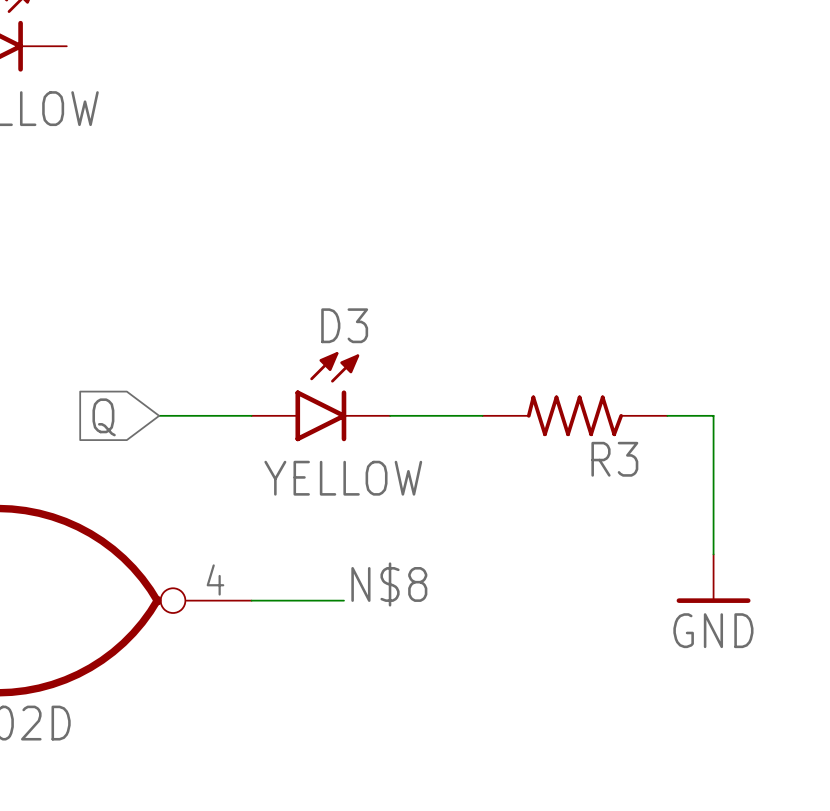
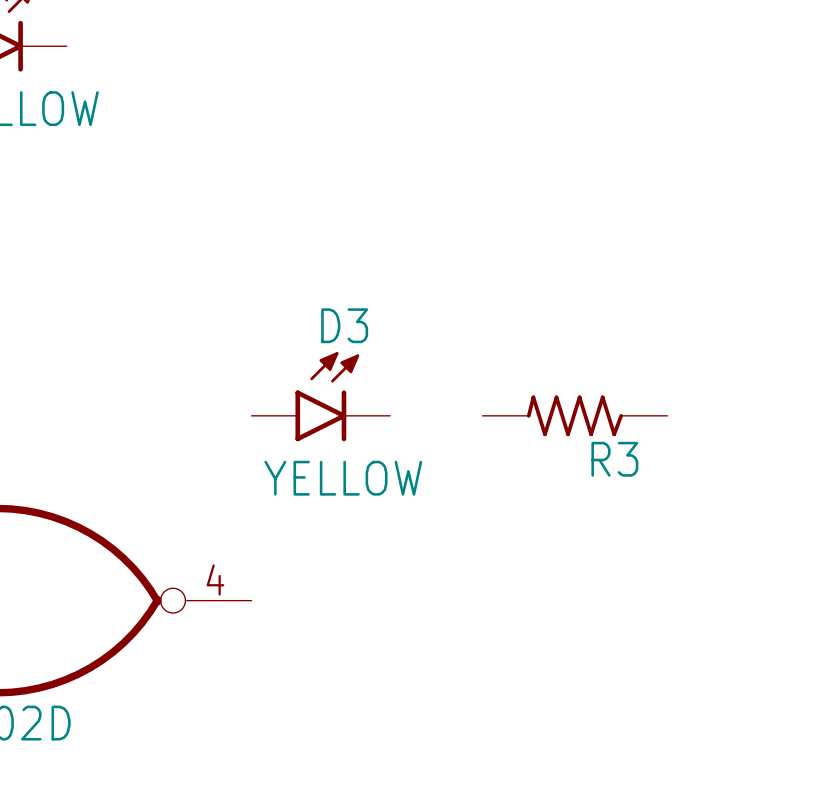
wire: (159, 415) (251, 415) -> none
wire: (390, 415) (482, 415) -> none
wire: (667, 415) (713, 415) (713, 554) -> none
global label: Q (104, 417) -> none
power symbol: GND (713, 578) -> none
label: N$8 (389, 584) -> none
wire: (251, 600) (343, 600) -> none

